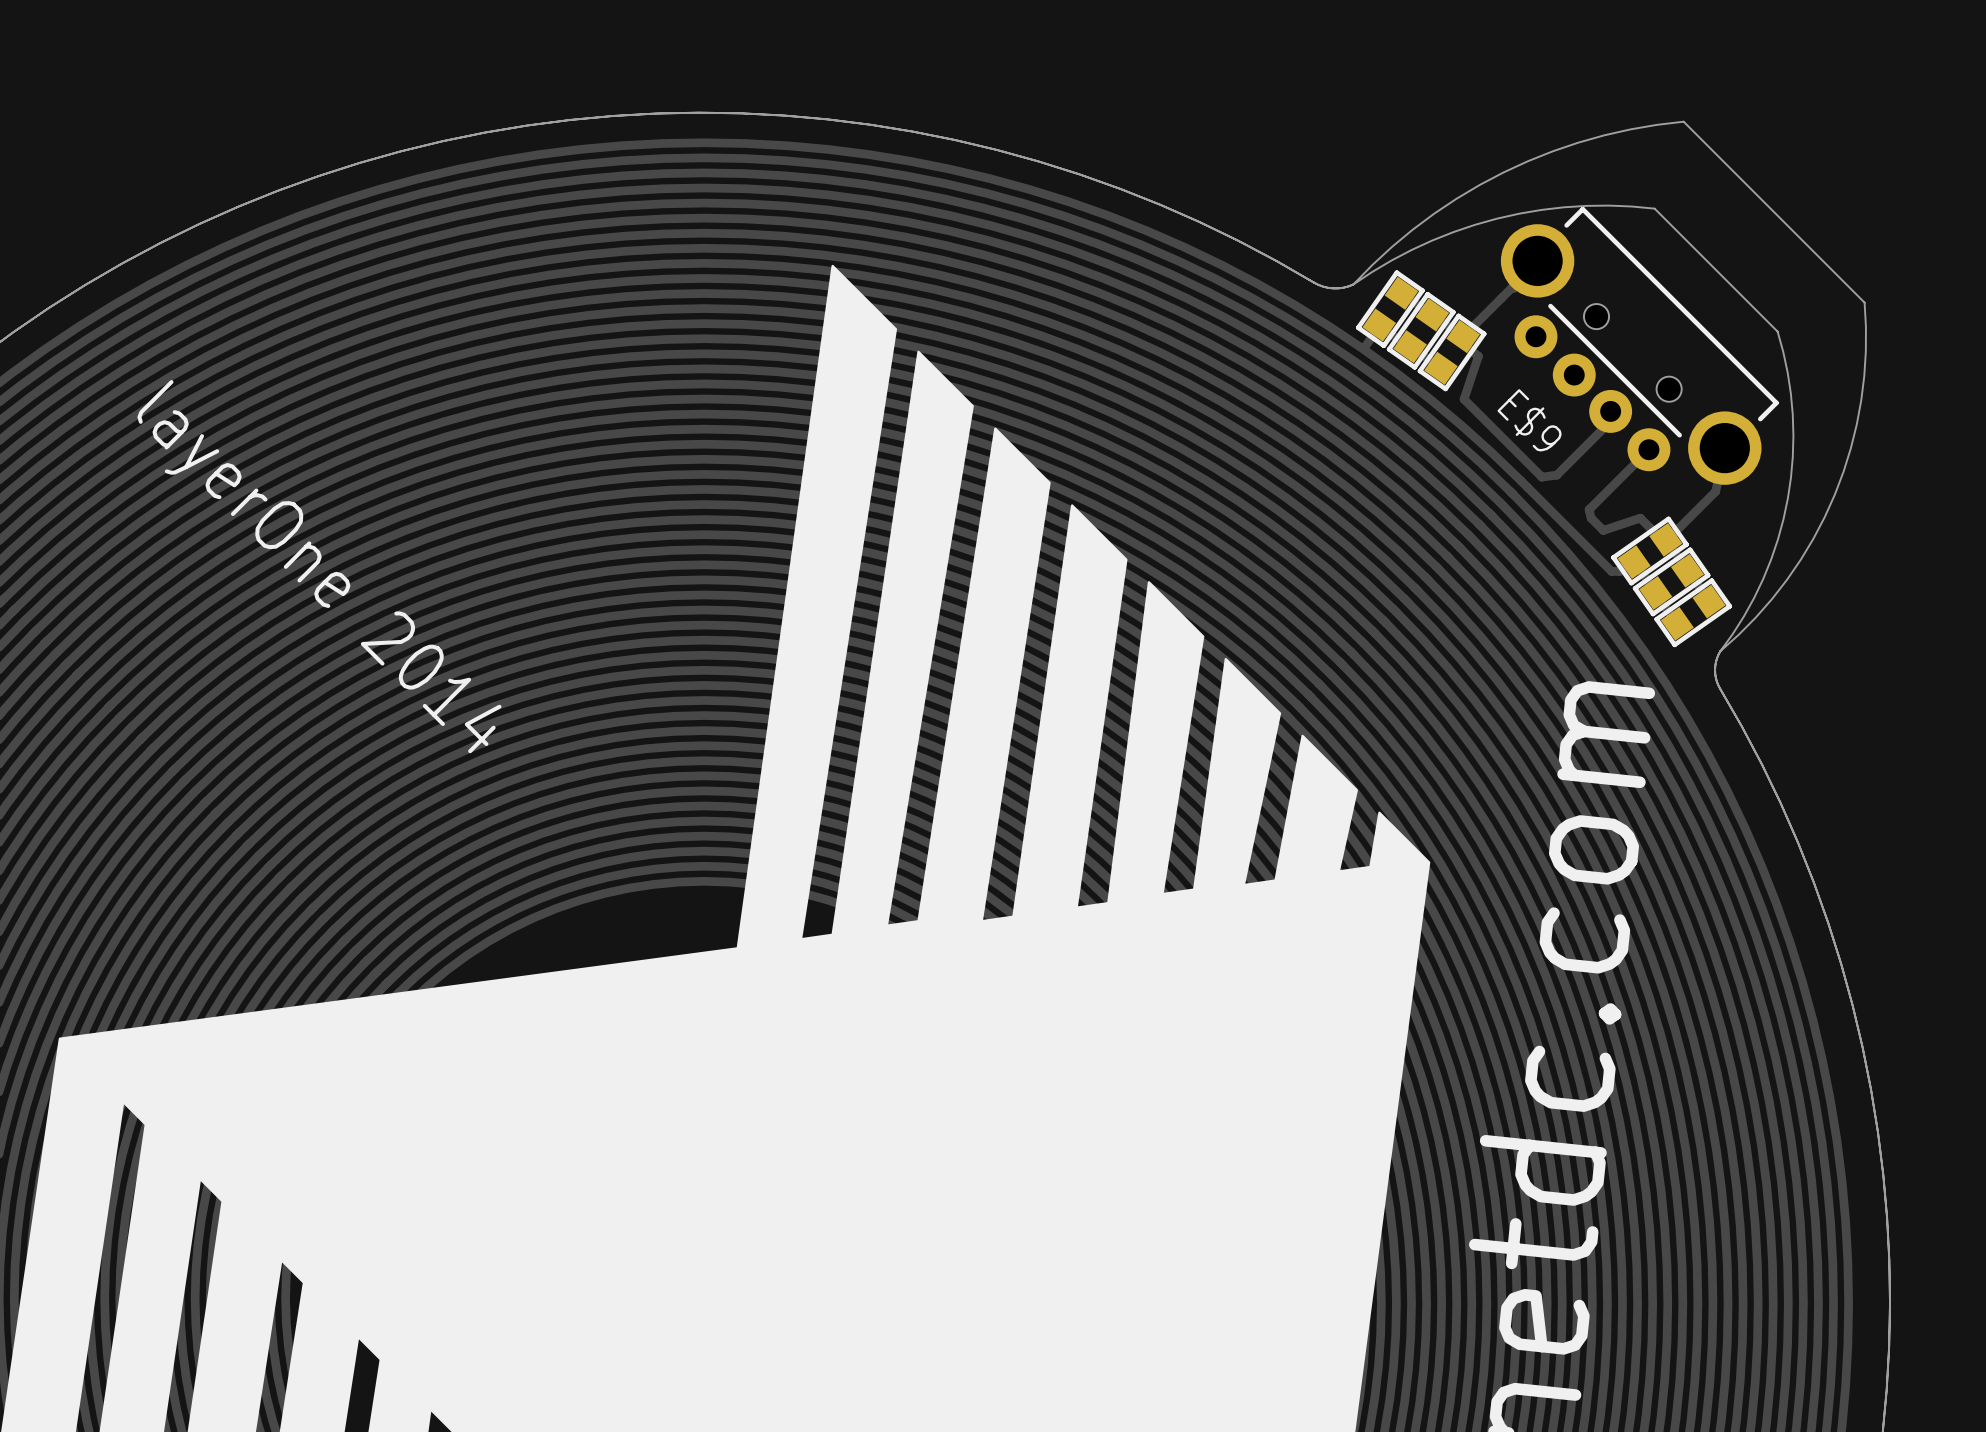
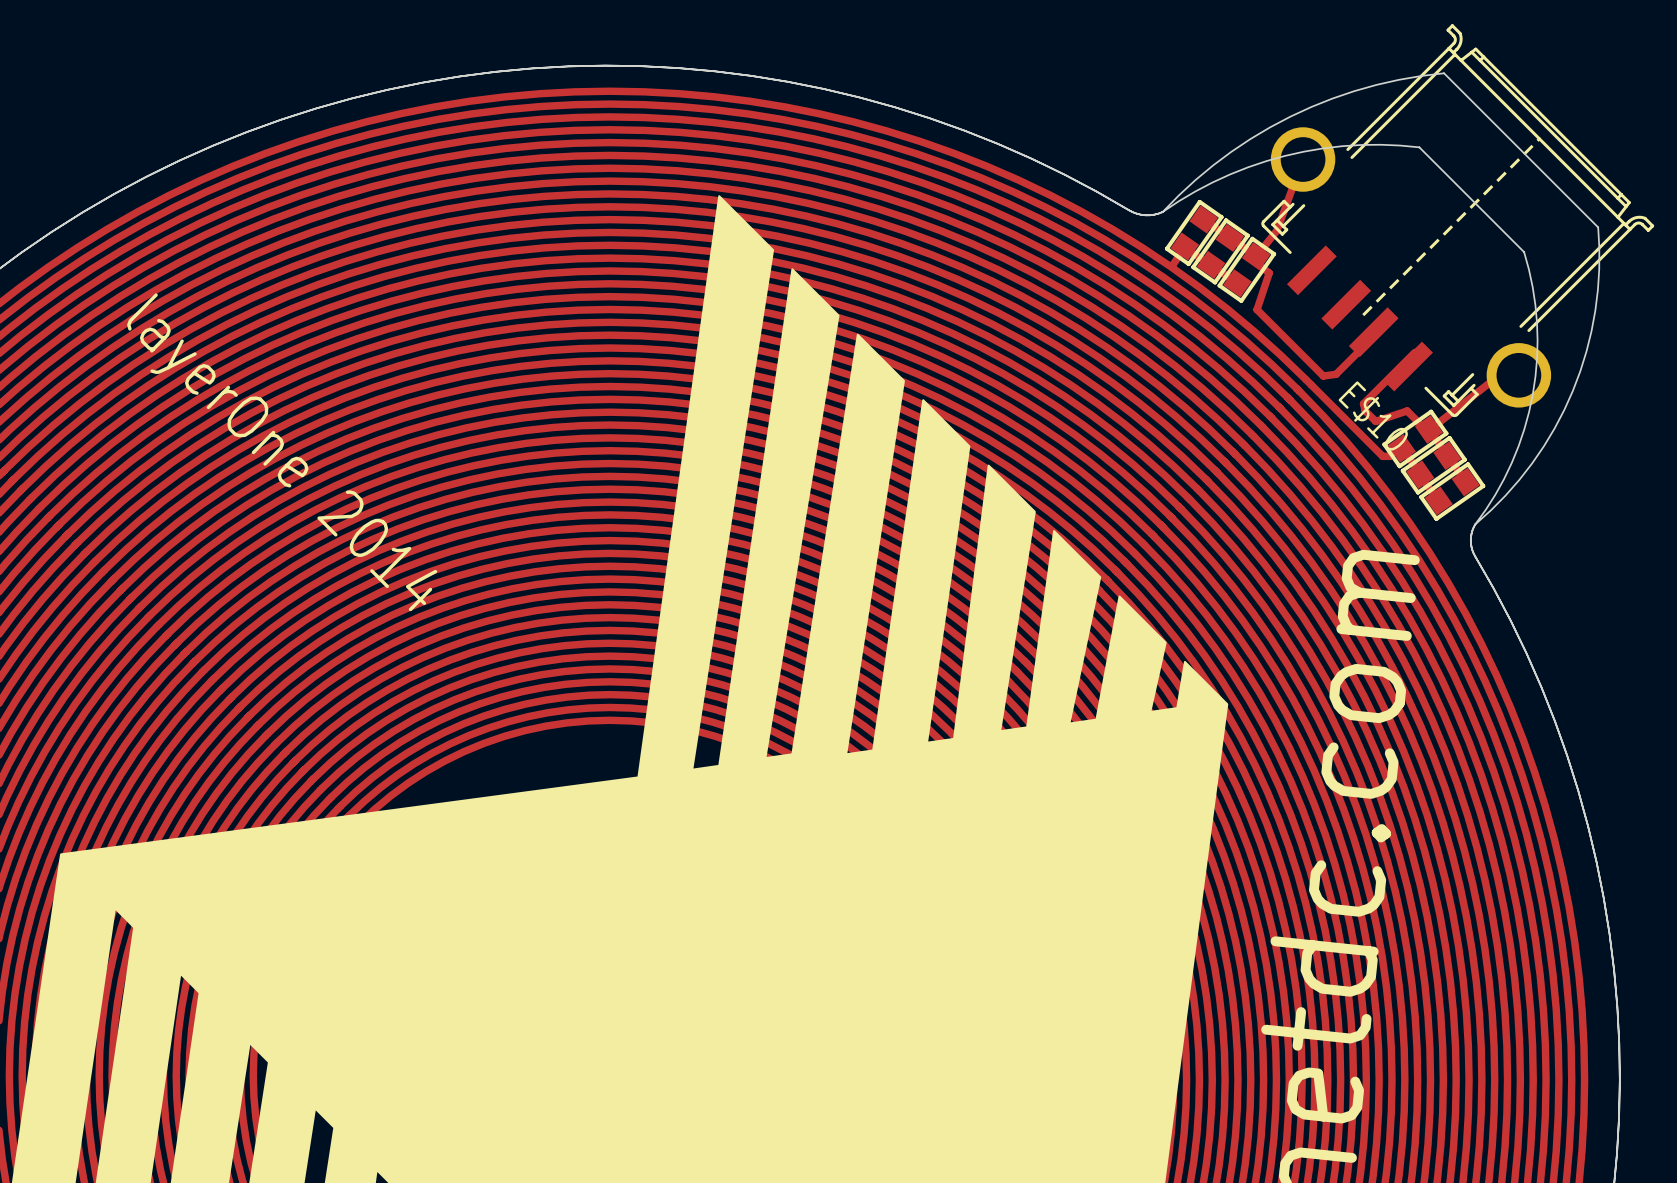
E$10: none -> (1457, 220)
track: (1501, 297) (1500, 296) (1540, 257) (1513, 288) (1463, 336) -> (1304, 159) (1298, 163) (1299, 168) (1276, 230) (1256, 256)
E$9: (1639, 345) -> none
track: (1724, 448) (1715, 491) (1667, 540) -> (1518, 375) (1498, 375) (1429, 429)

